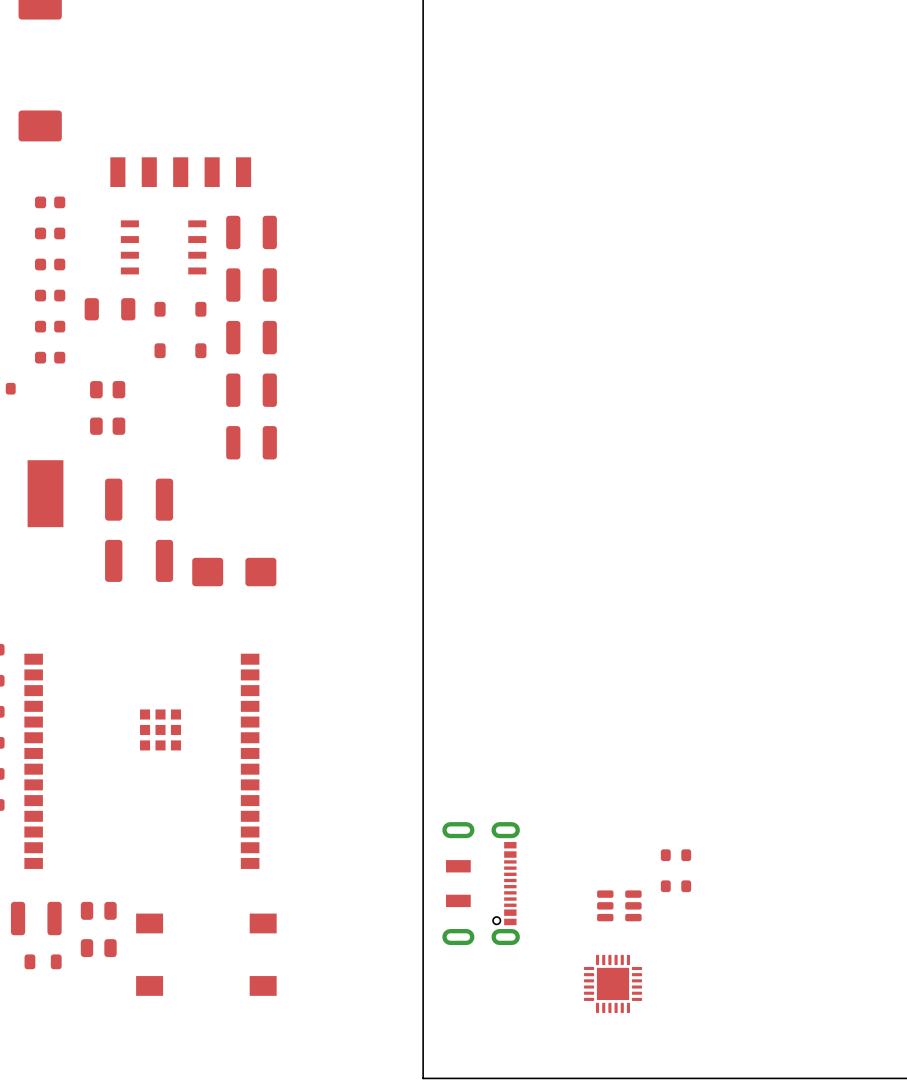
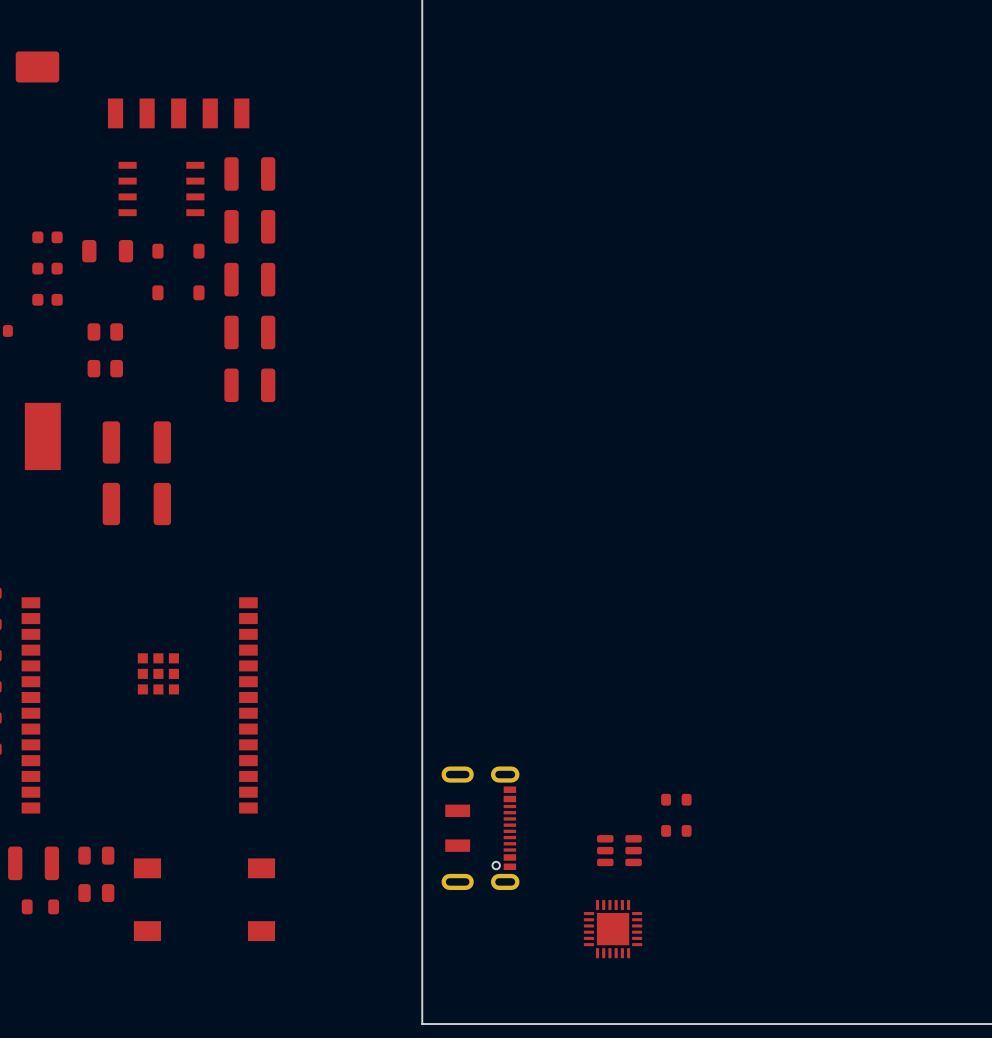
part: (50, 202) -> none
part: (50, 233) -> none
part: (50, 264) -> none
part: (234, 572) -> none

